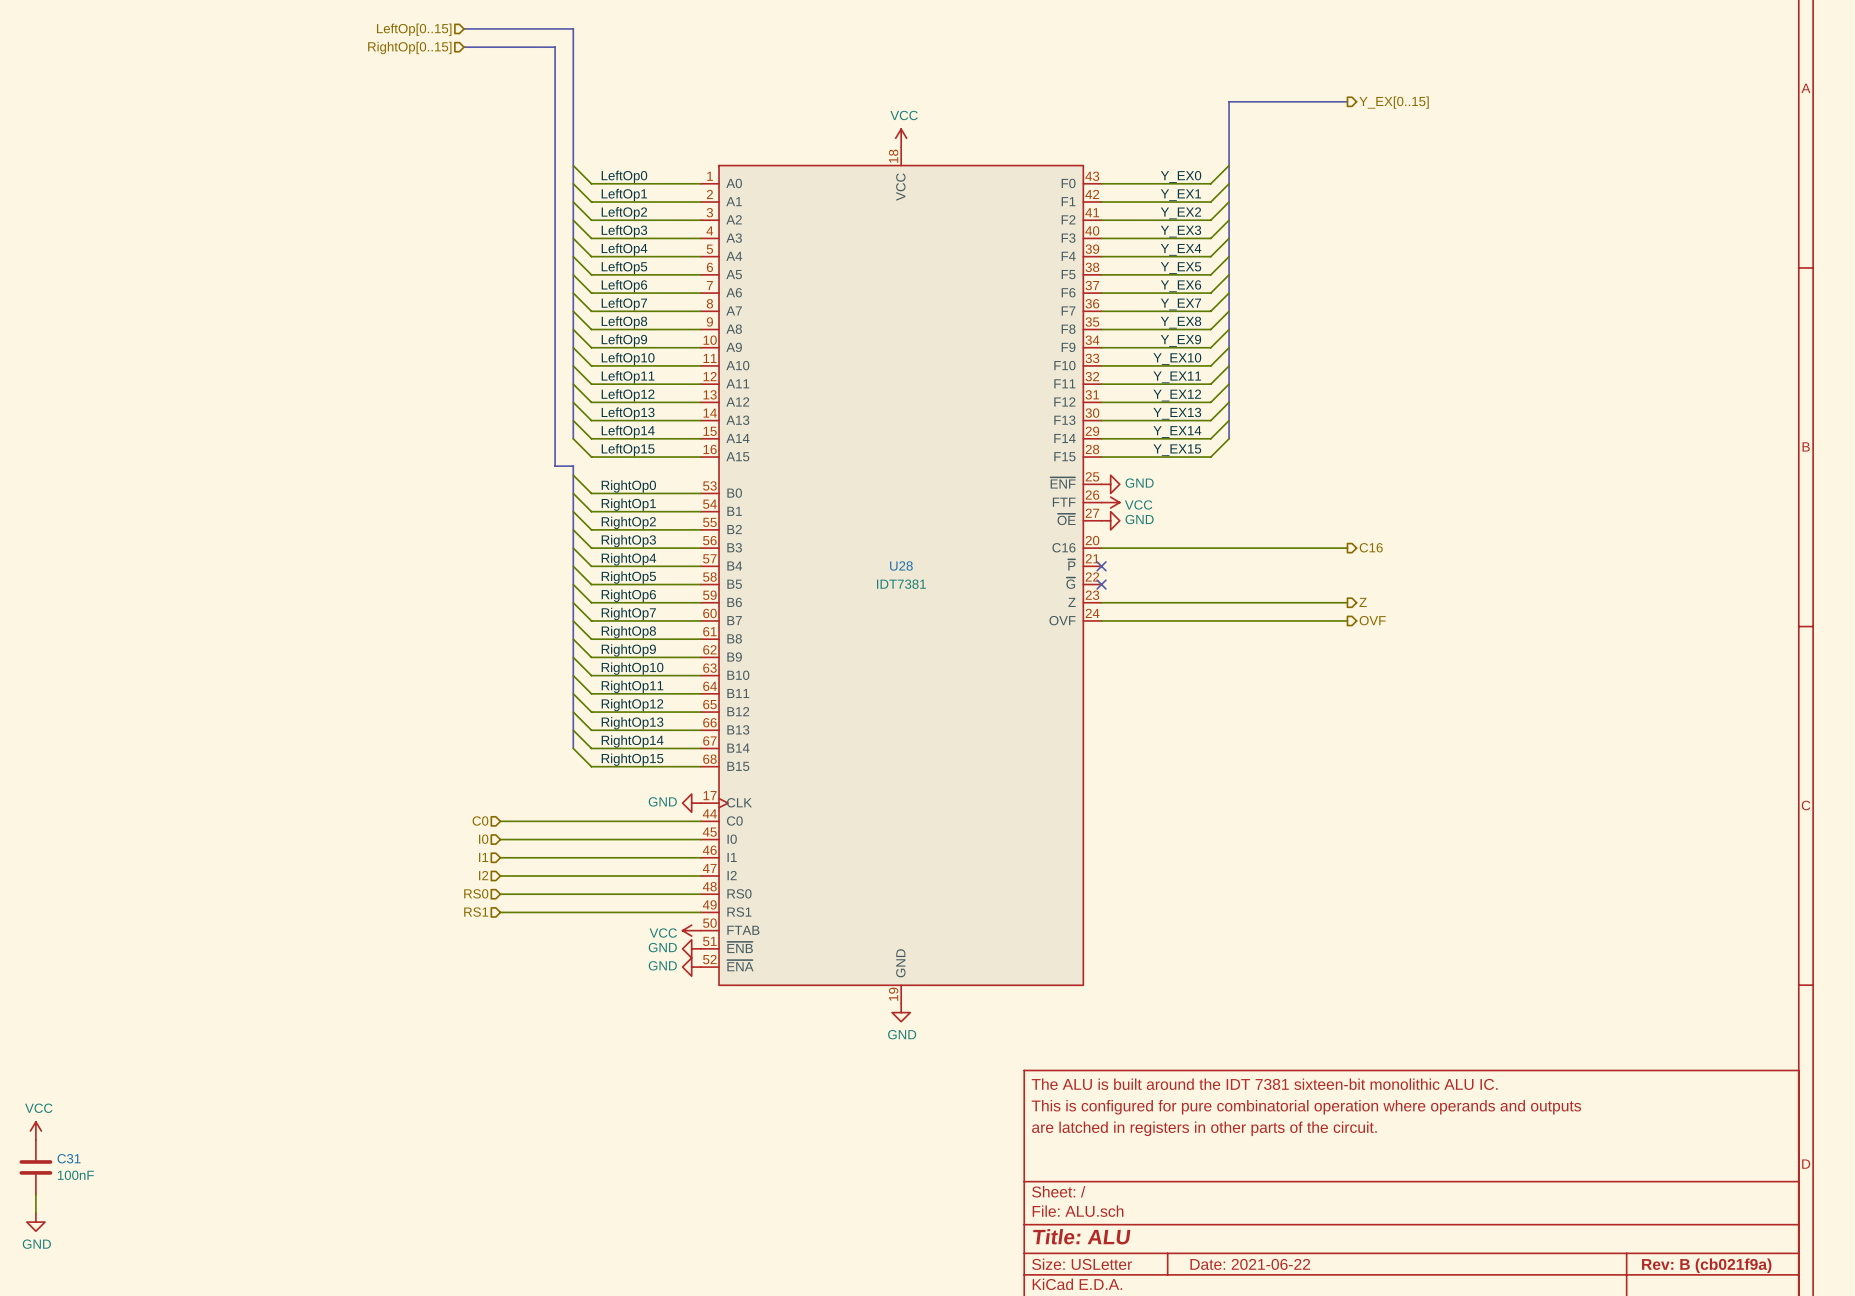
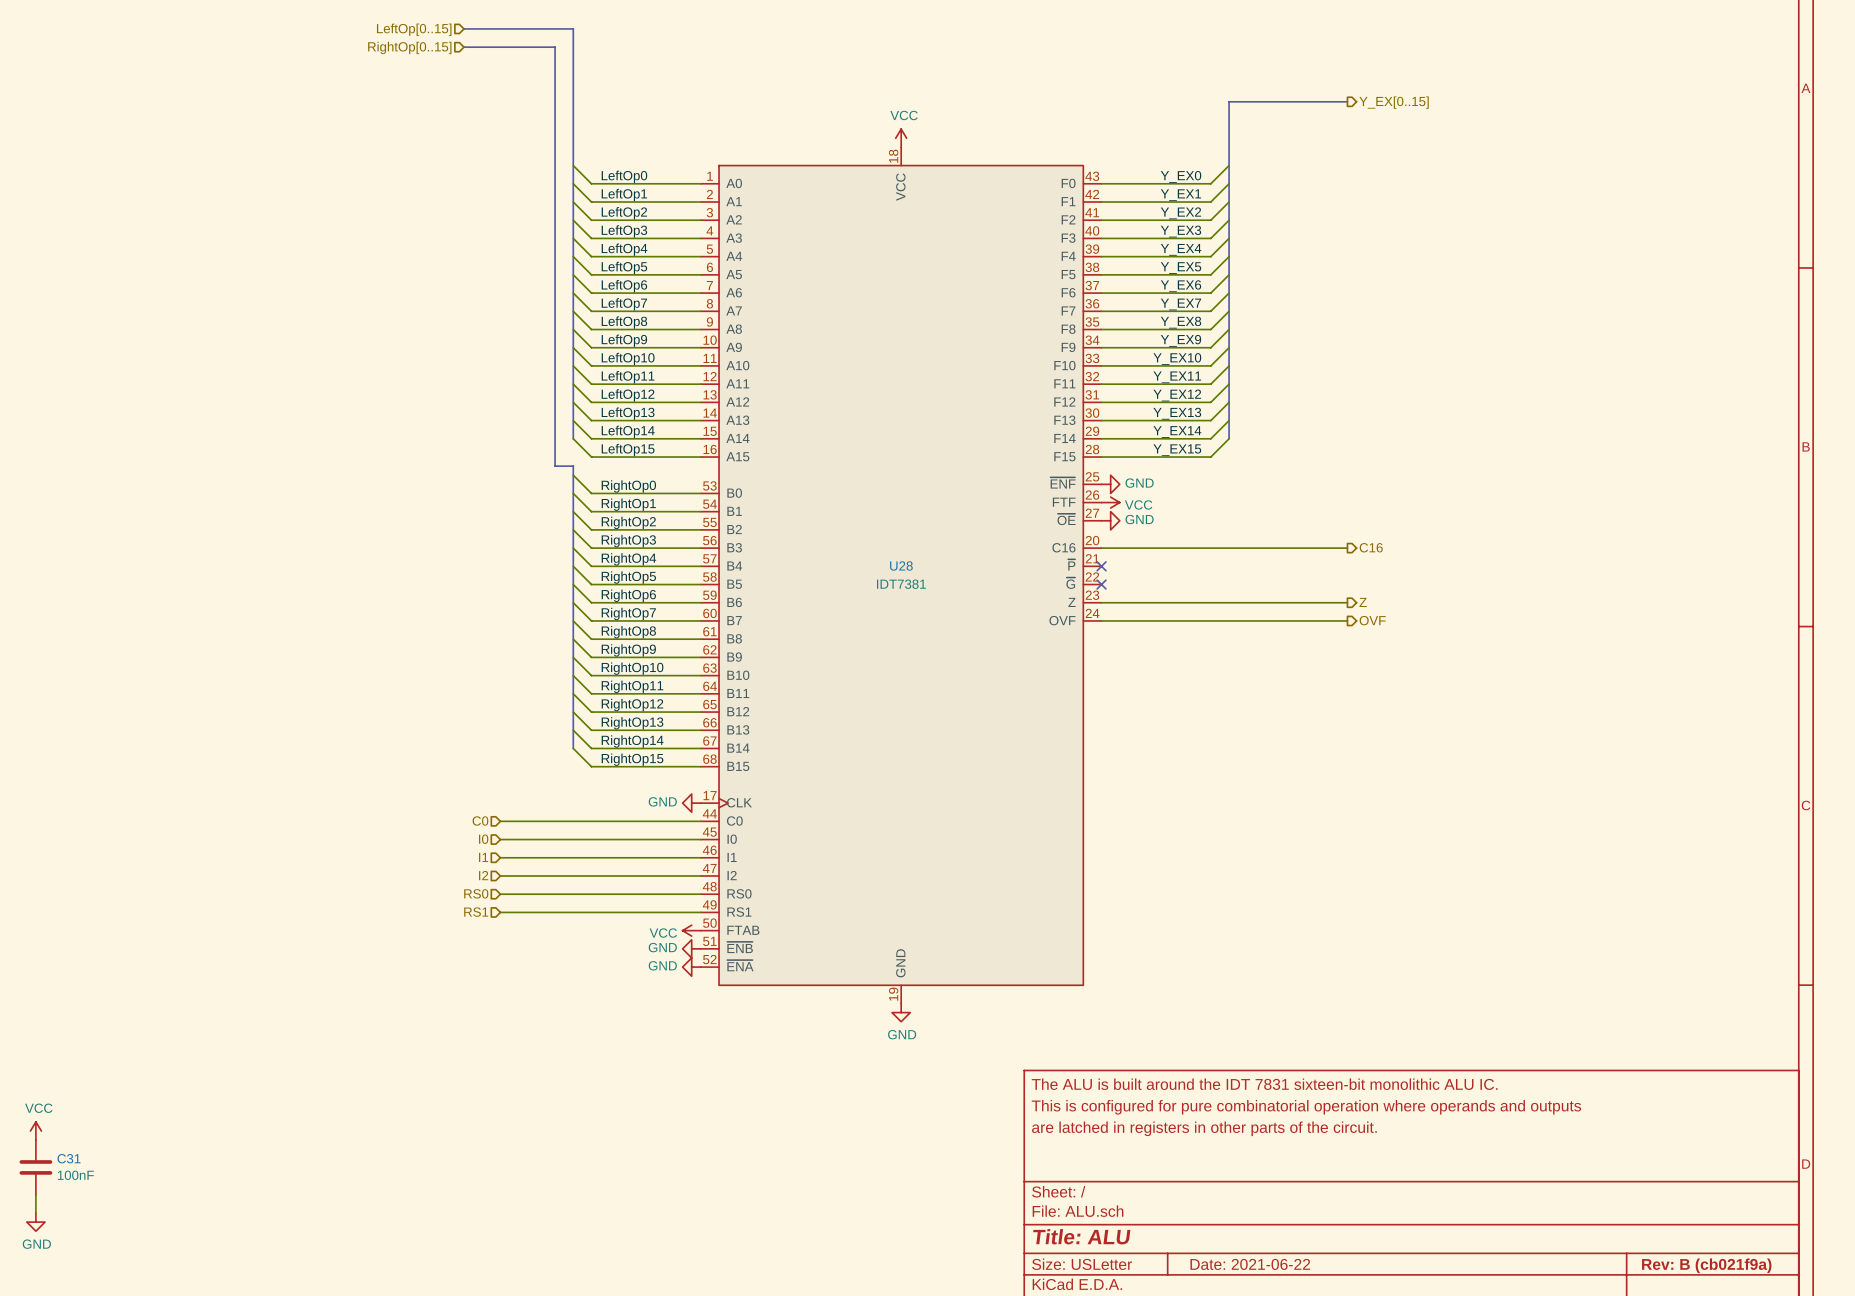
title block: The ALU is built around the IDT 7381 sixteen-bit monolithic ALU IC. (1264, 1084) -> The ALU is built around the IDT 7831 sixteen-bit monolithic ALU IC. (1264, 1084)

